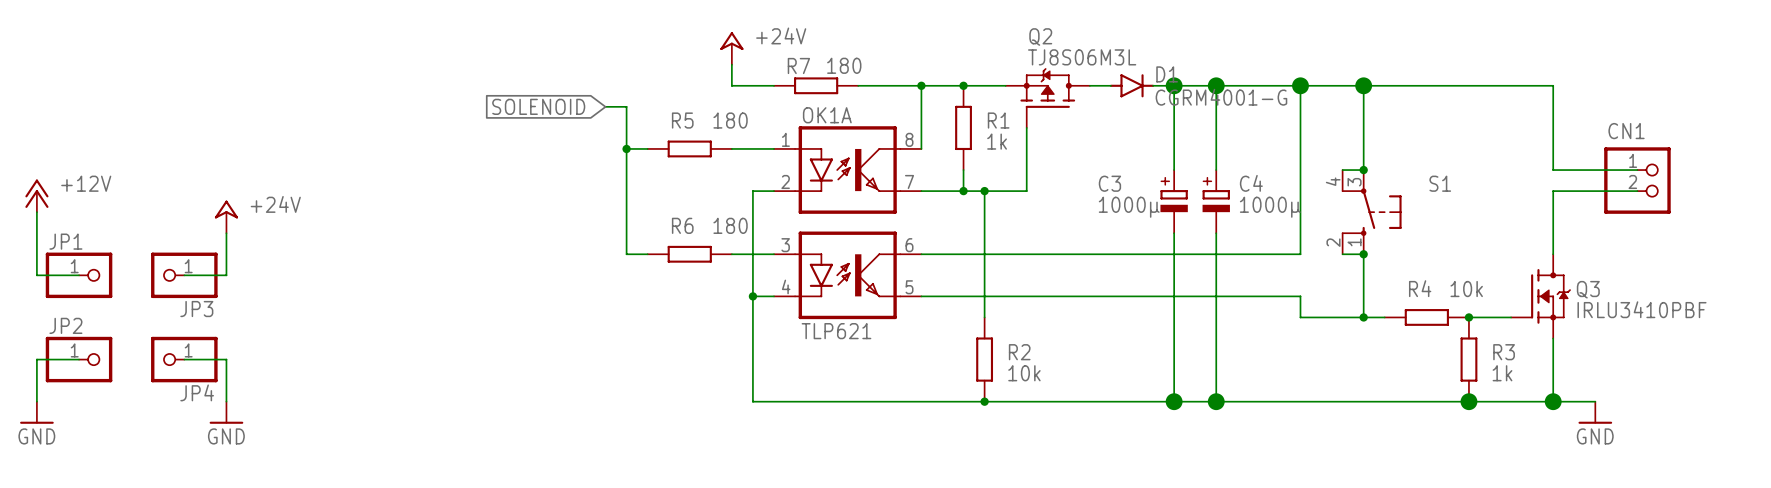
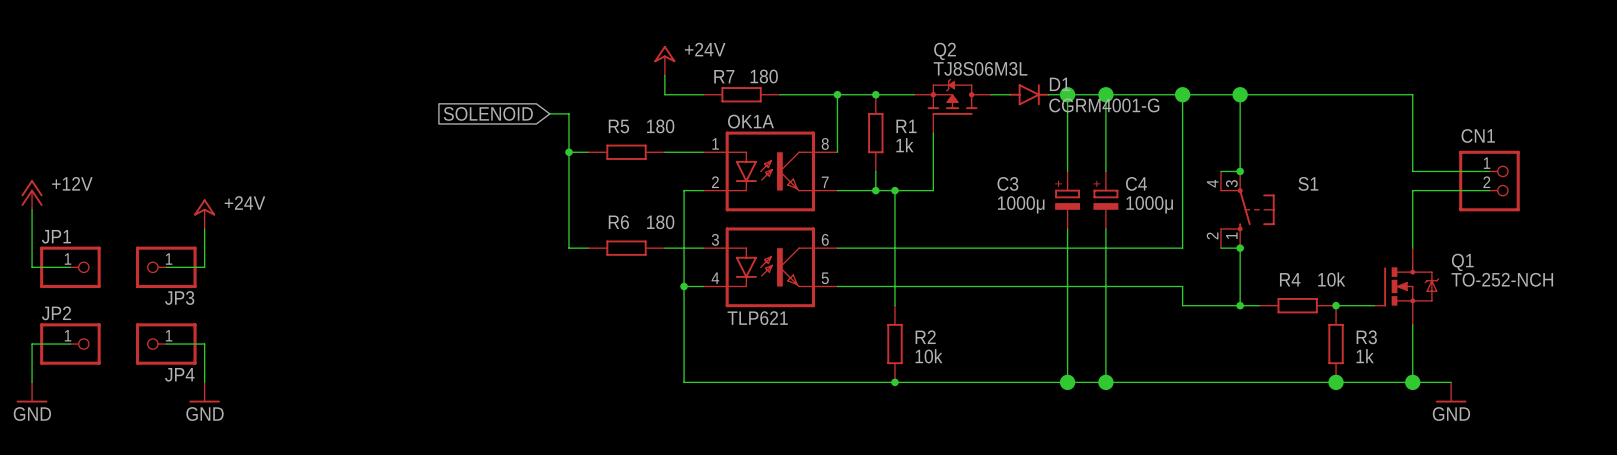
Q3: IRLU3410PBF (1540, 296) -> none
Q1: none -> TO-252-NCH (1406, 286)

